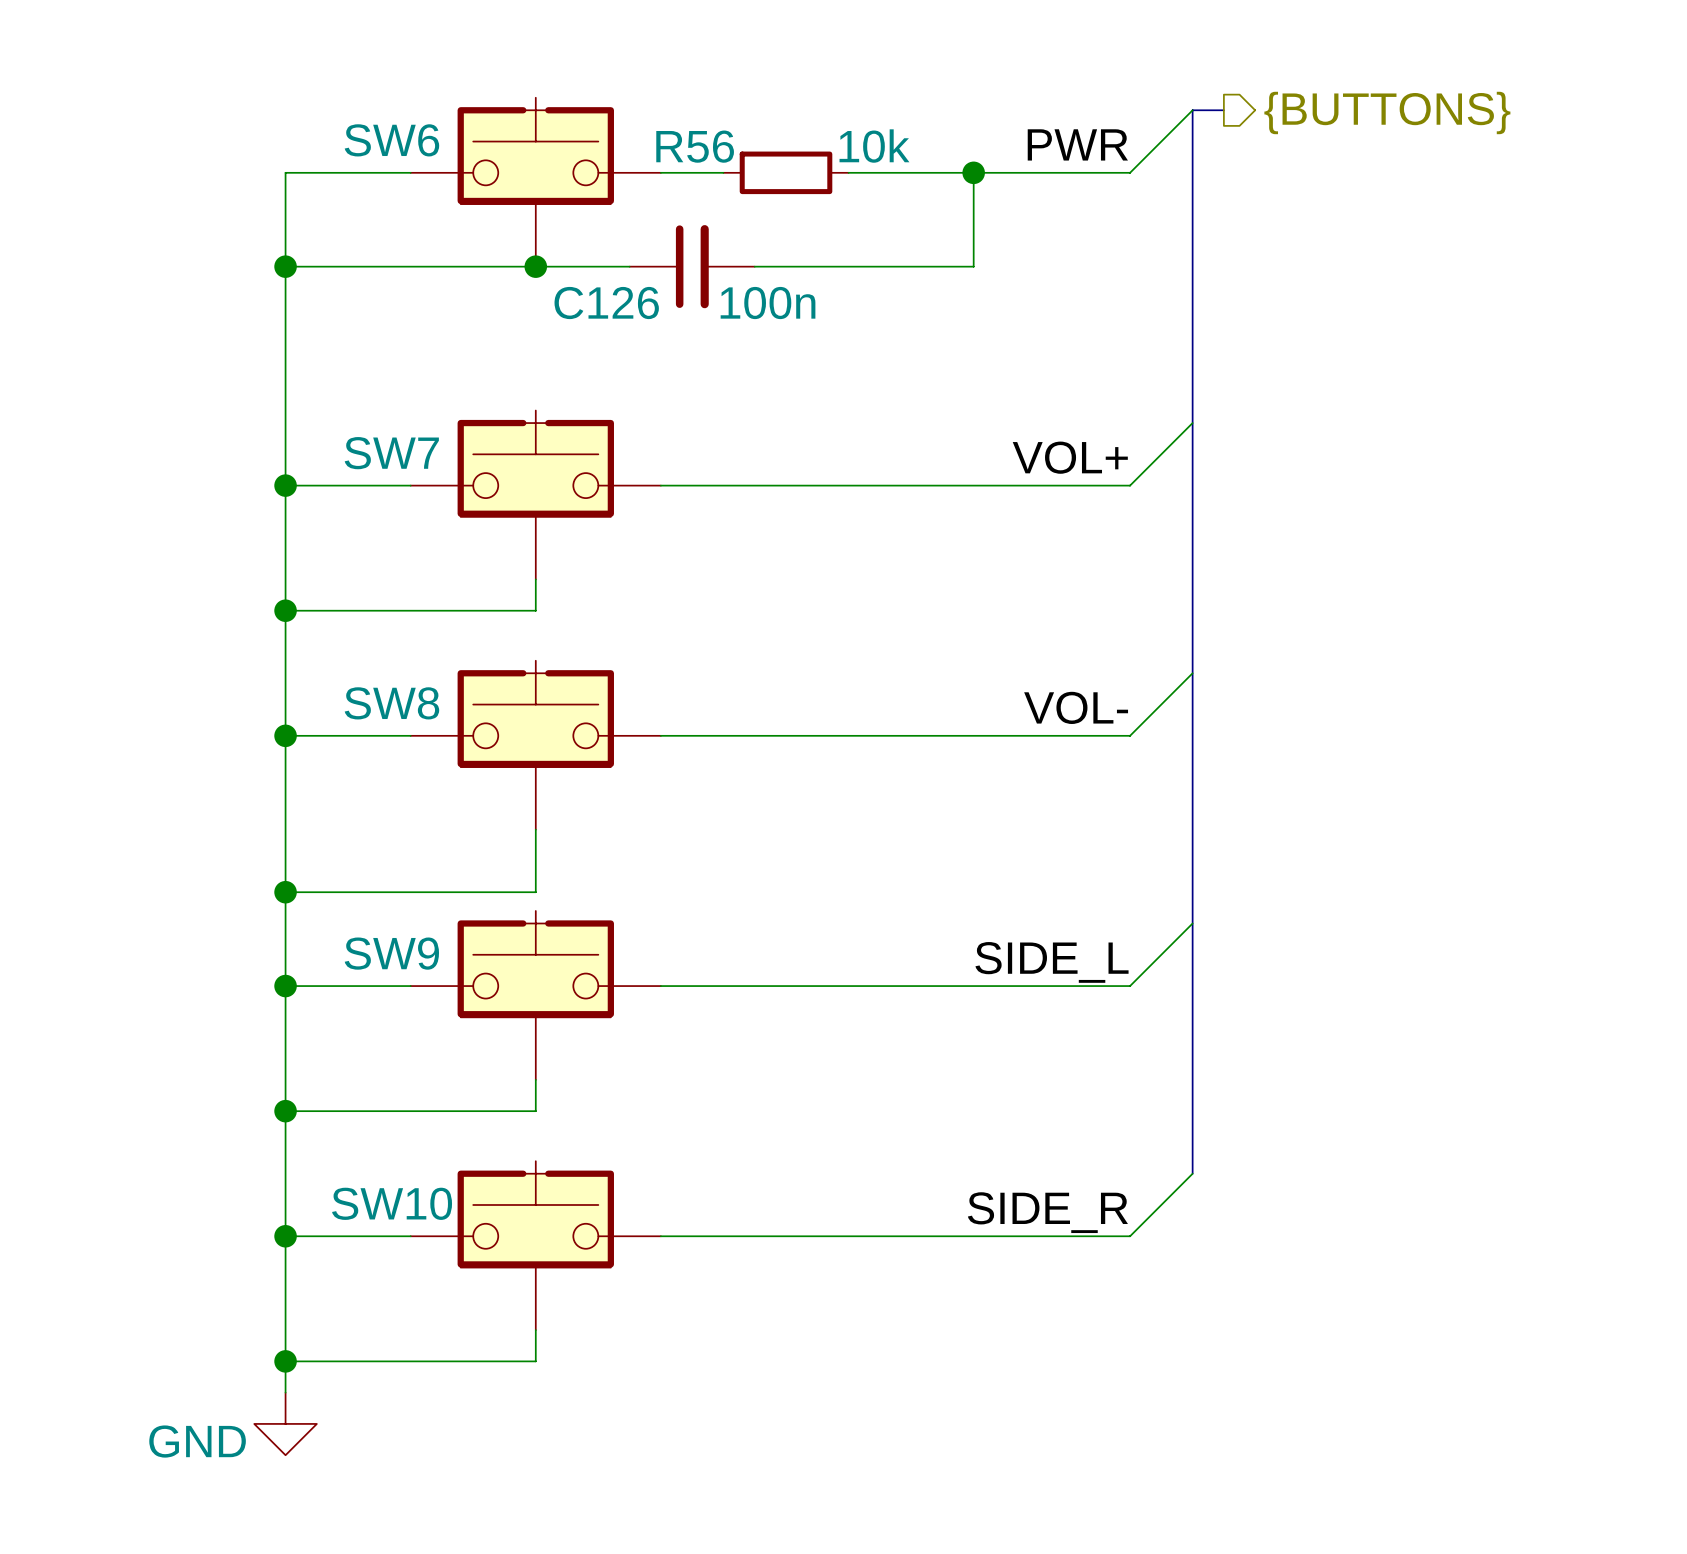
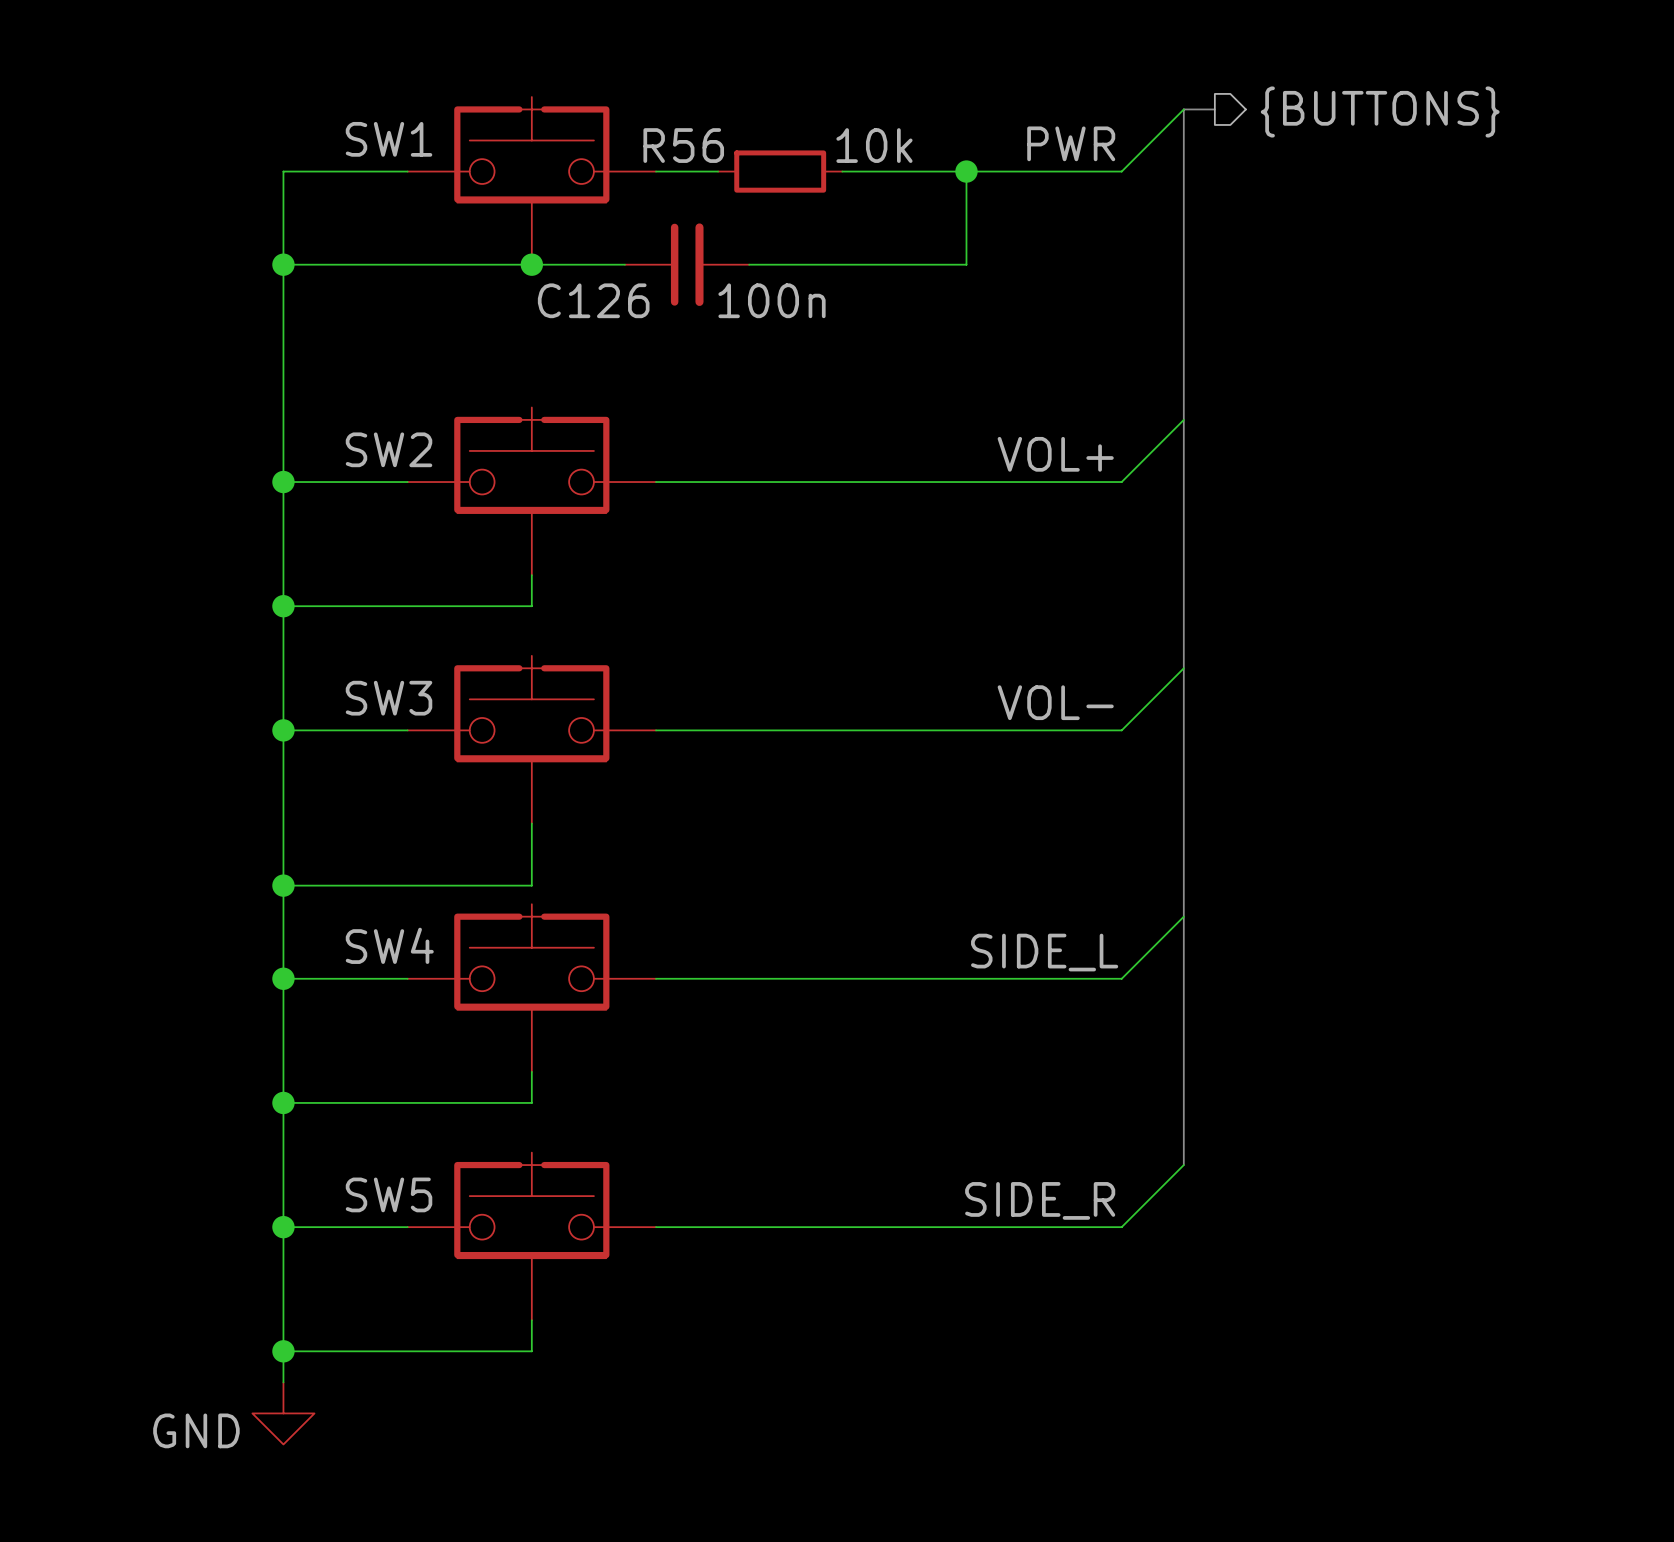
SW6 name: SW6 (391, 140) -> SW1 (389, 139)
SW7 name: SW7 (391, 453) -> SW2 (389, 449)
SW8 name: SW8 (391, 703) -> SW3 (389, 698)
SW9 name: SW9 (391, 953) -> SW4 (389, 945)
SW10 name: SW10 (392, 1203) -> SW5 (389, 1194)

